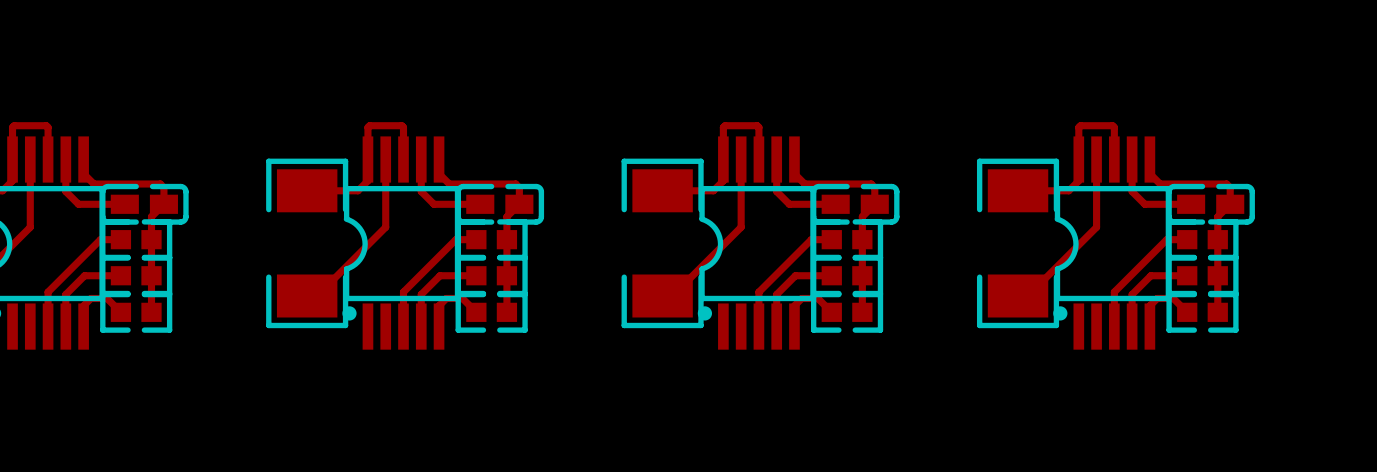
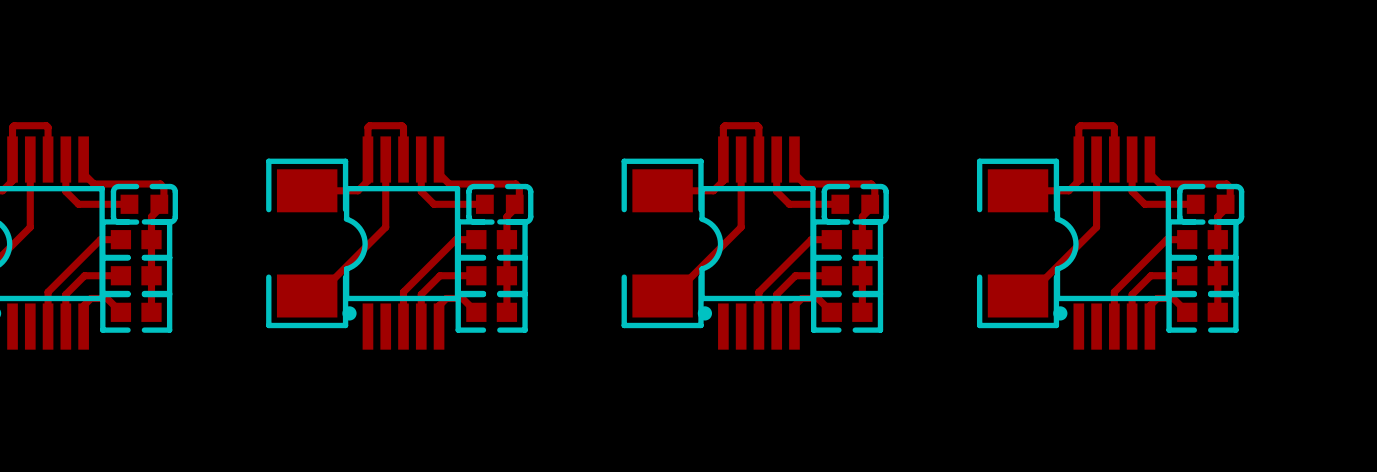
part footprint: [100, 183, 189, 225] -> [110, 183, 178, 225]
part footprint: [455, 183, 545, 225] -> [466, 183, 534, 225]
part footprint: [810, 183, 900, 225] -> [821, 183, 889, 225]
part footprint: [1166, 183, 1255, 225] -> [1177, 183, 1245, 225]

